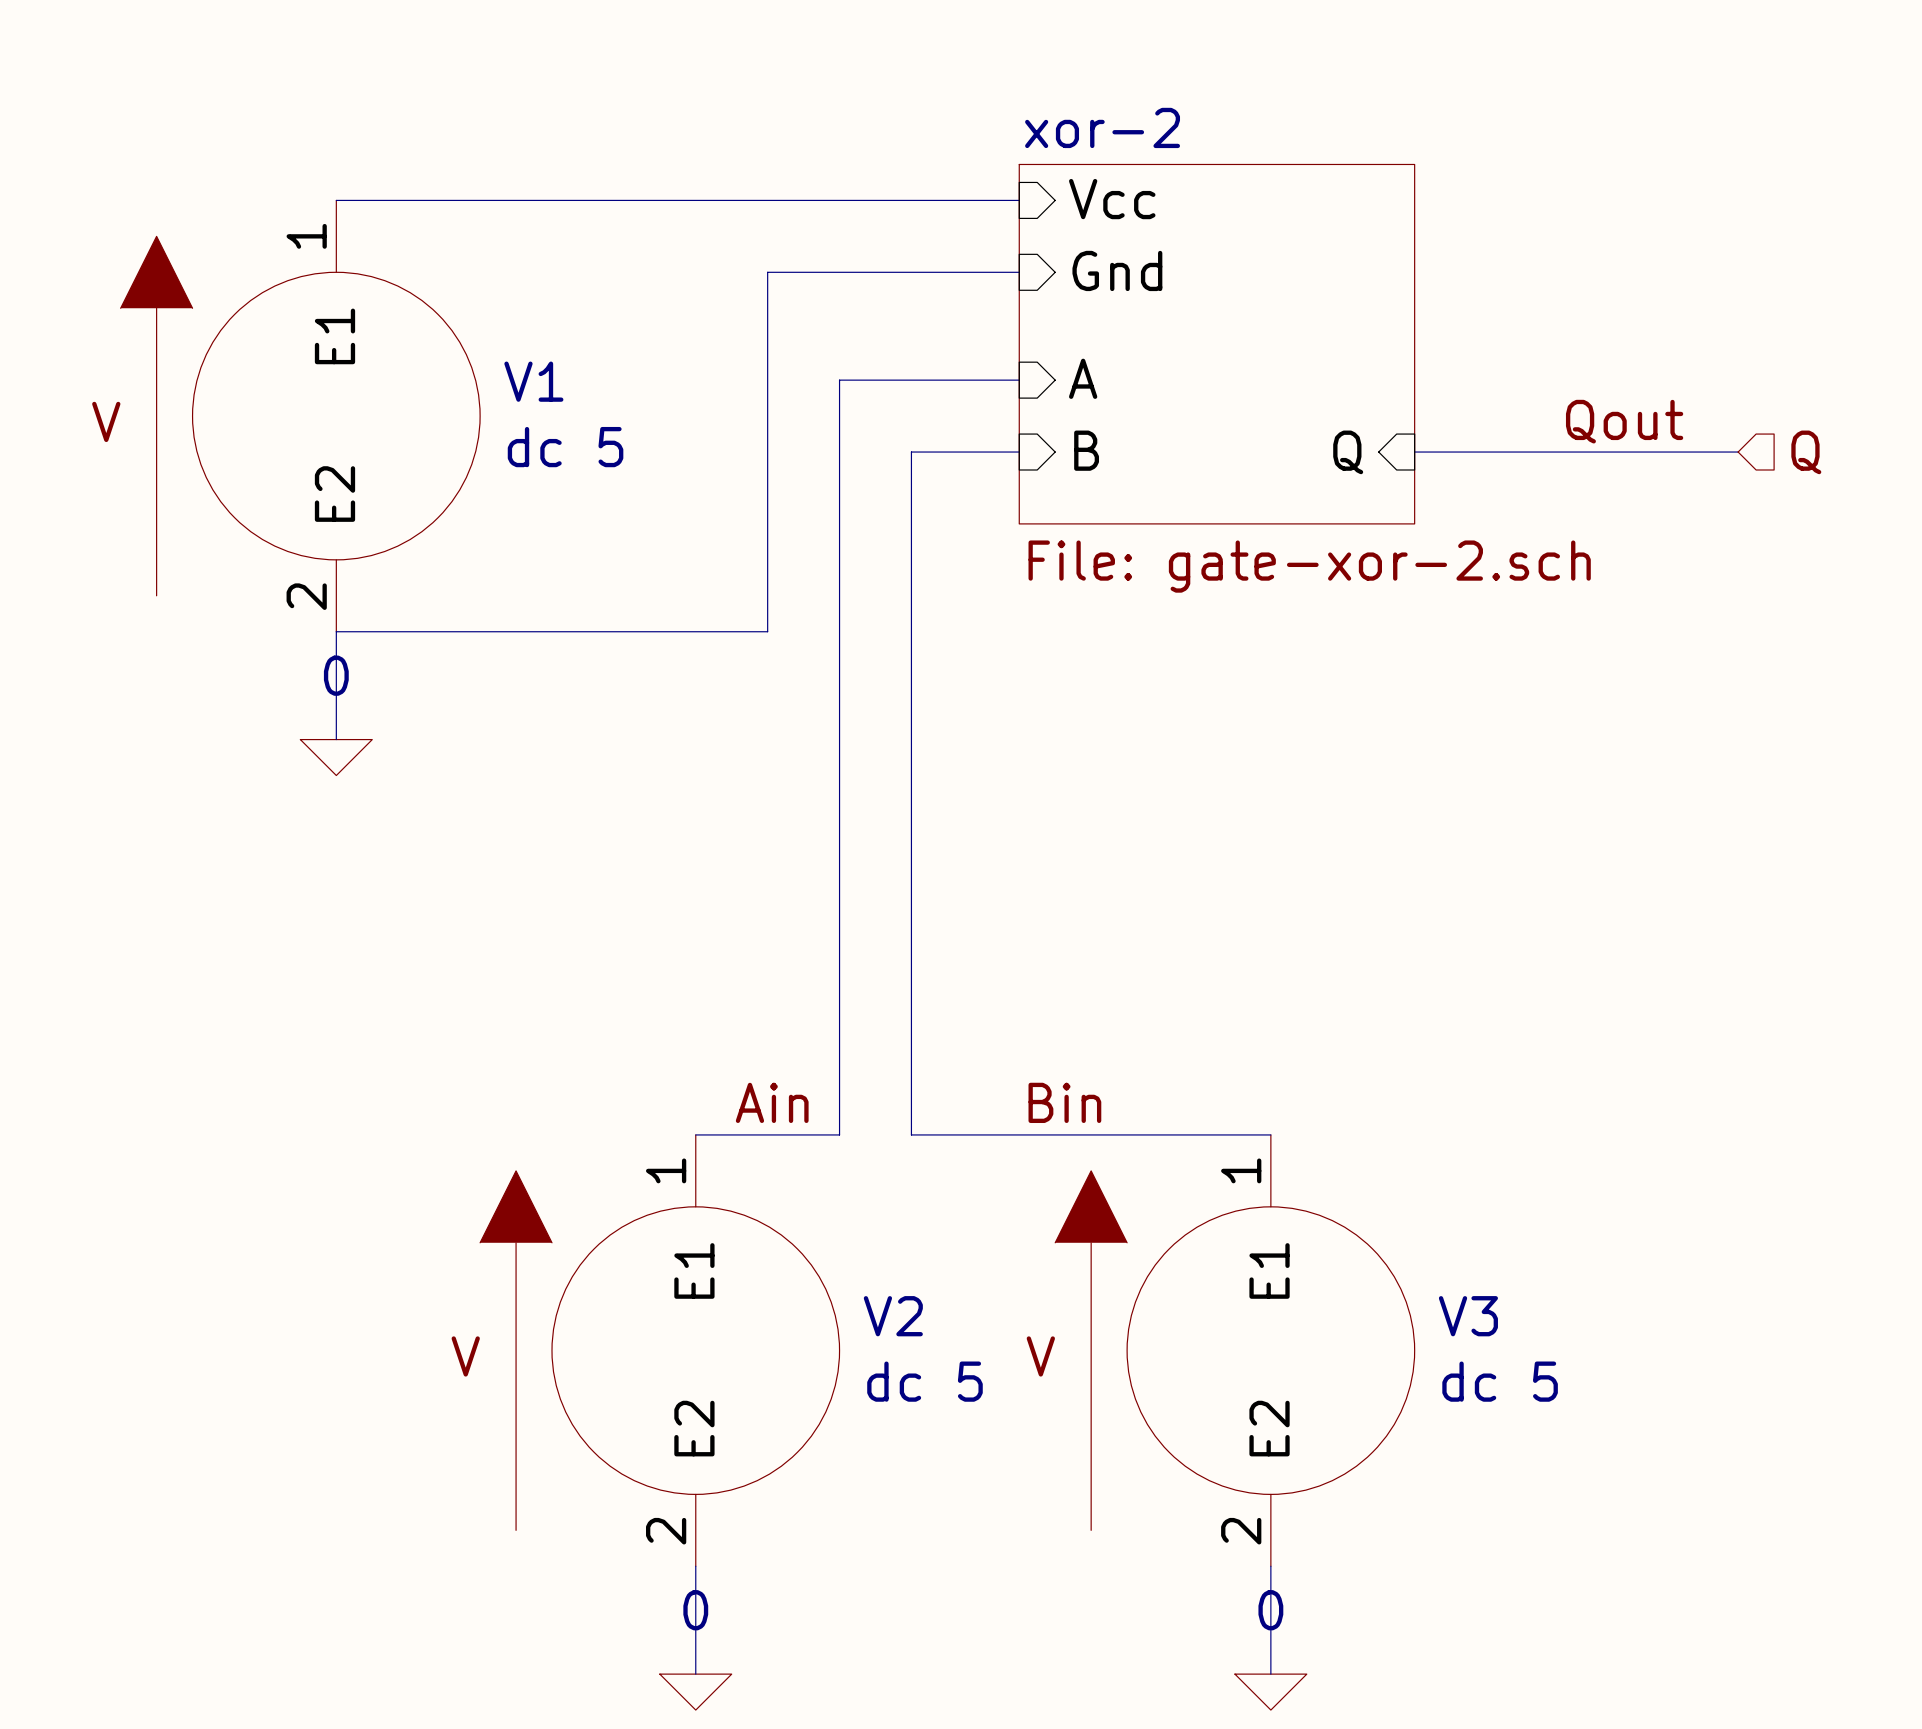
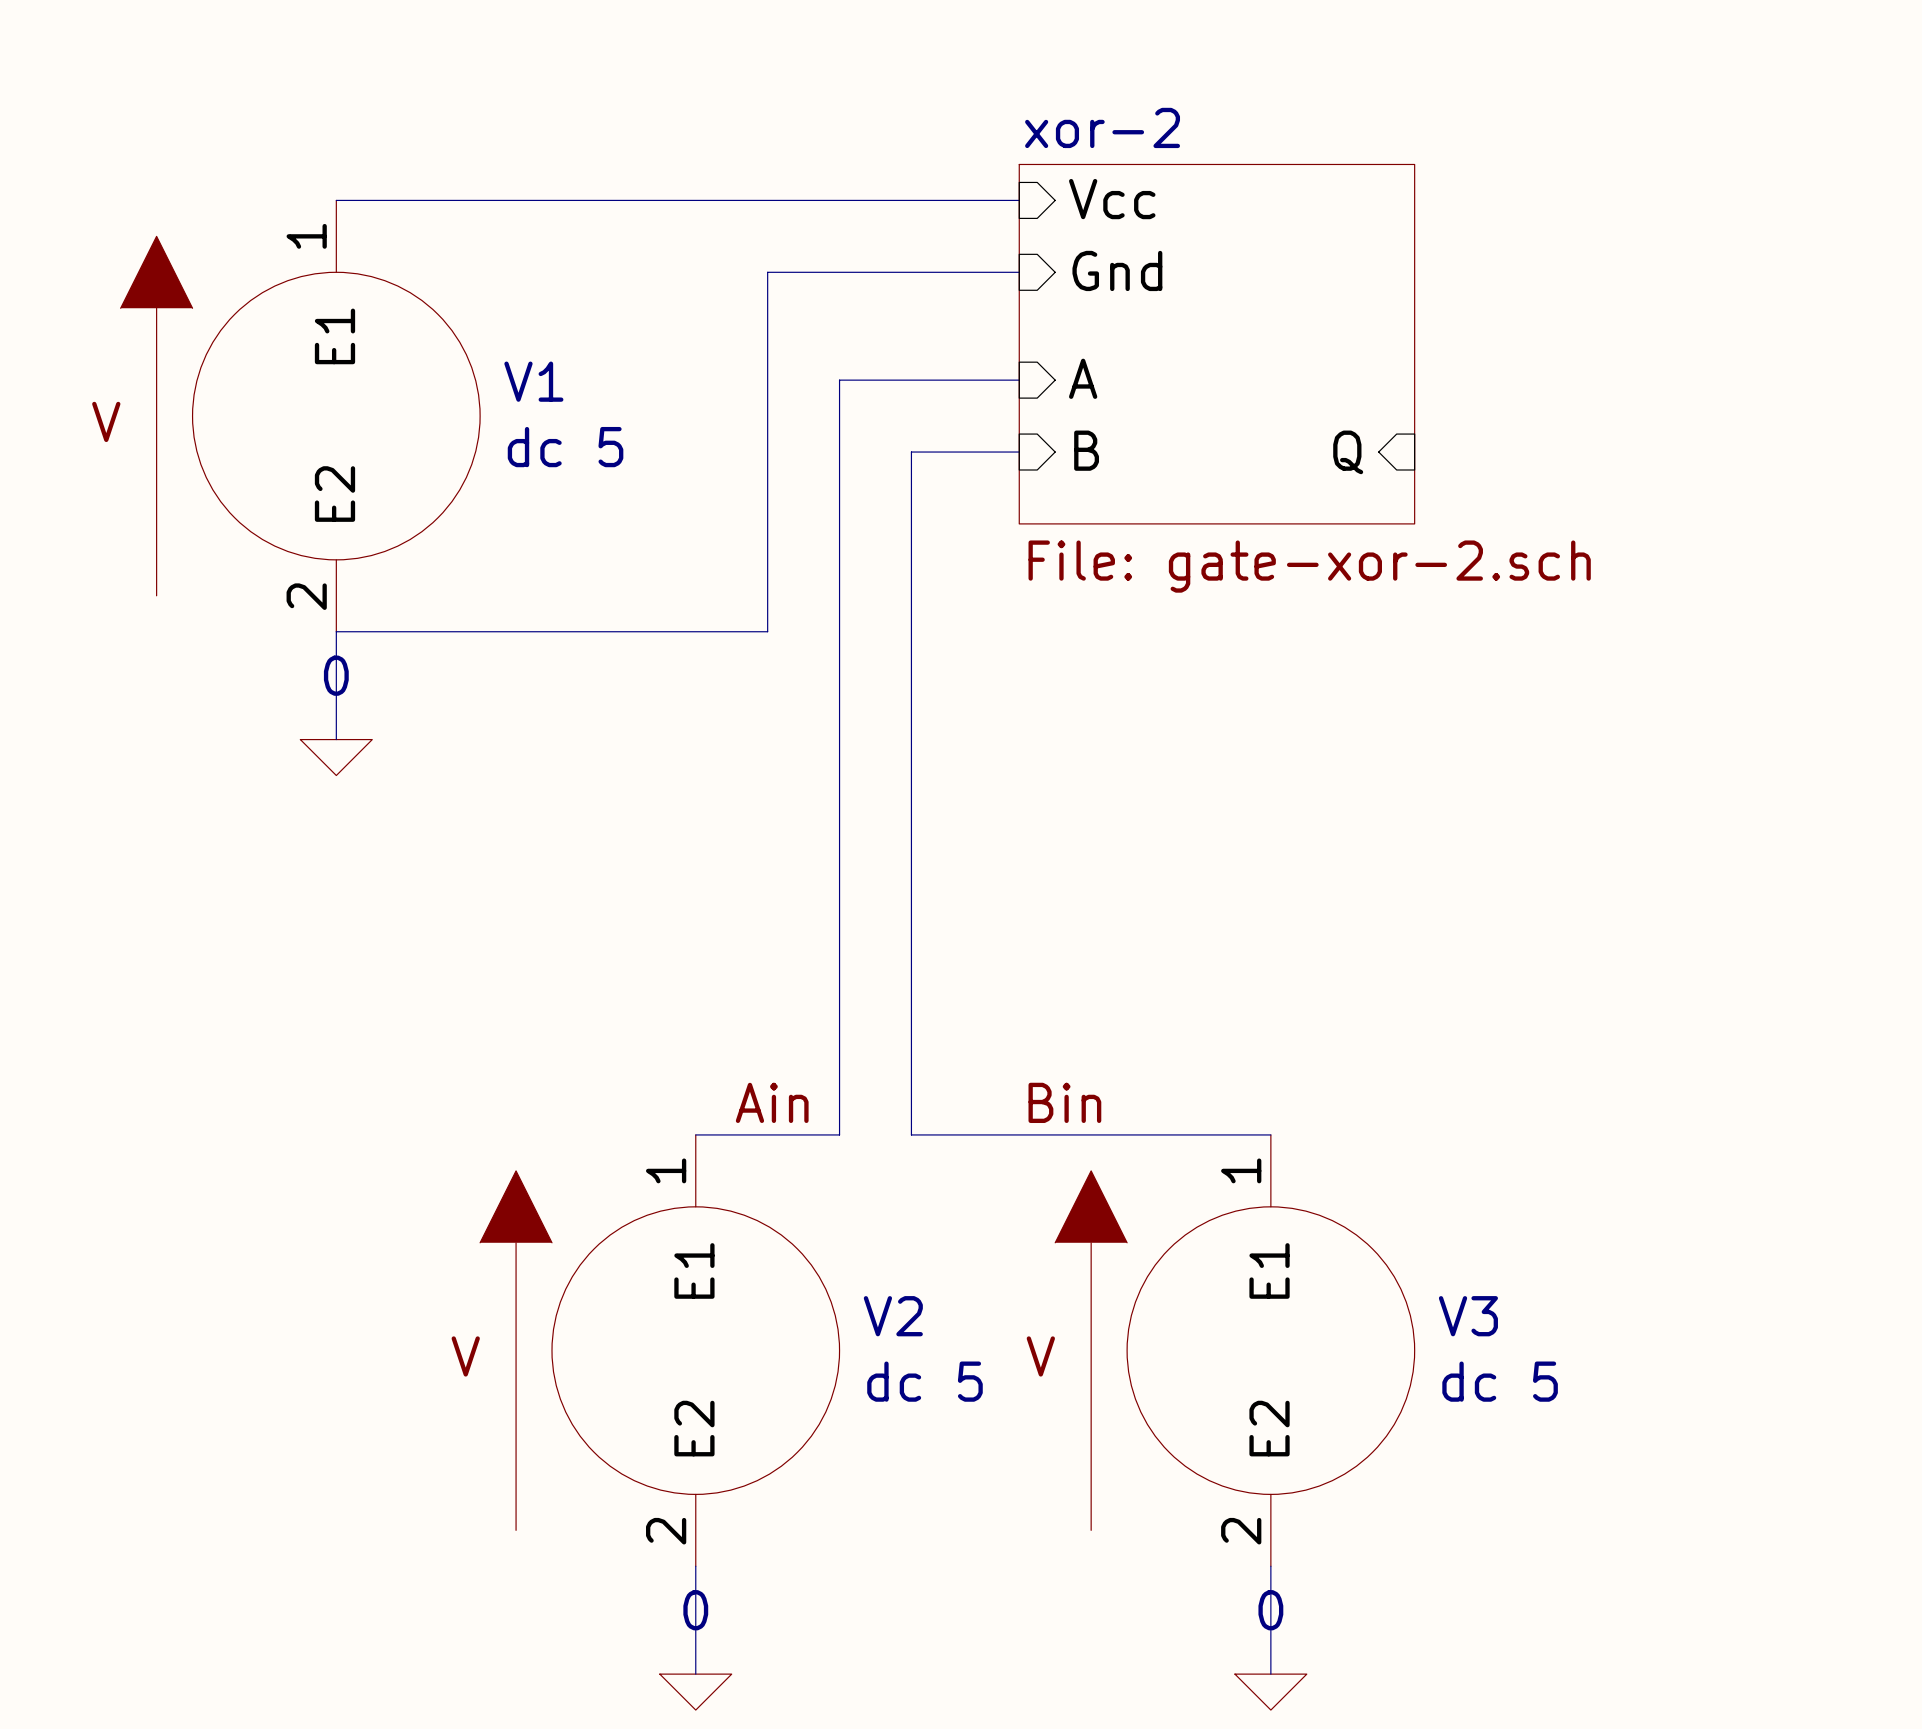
label: Qout (1624, 421) -> none
wire: (1414, 452) (1738, 452) -> none
hierarchical label: Q (1806, 452) -> none

